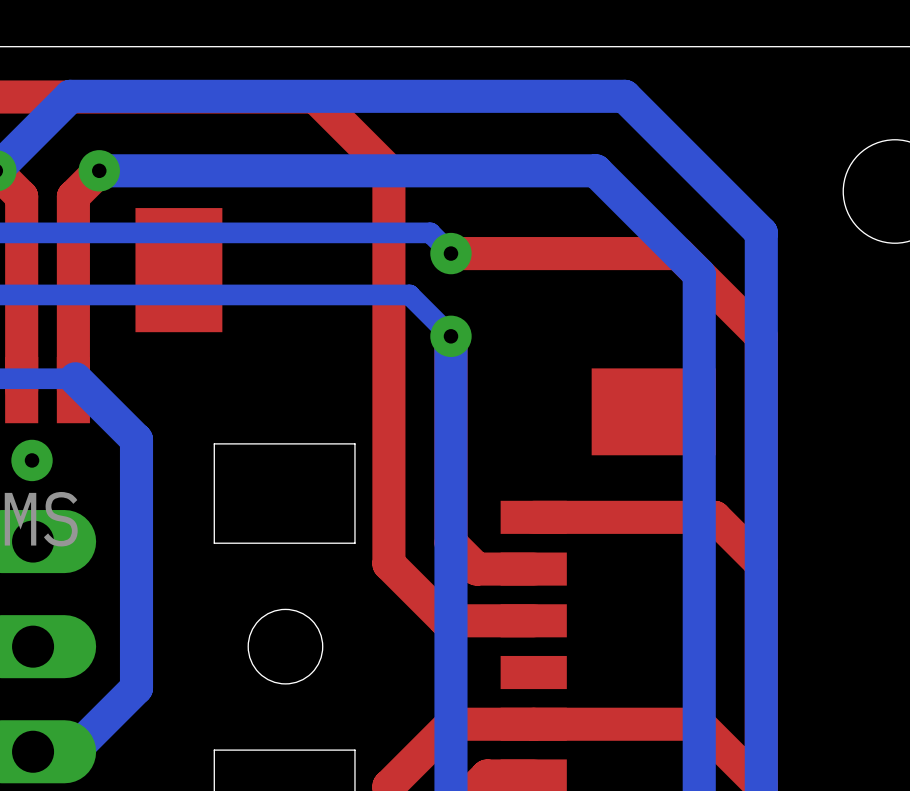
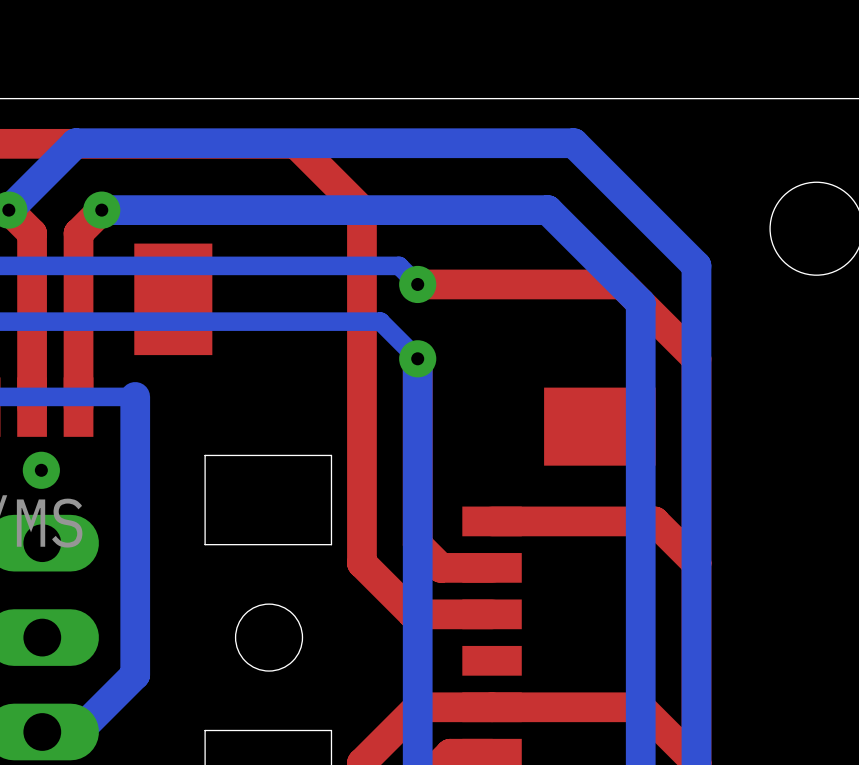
bottom track: (75, 378) (136, 439) -> (80, 396) (135, 396) (135, 451)

